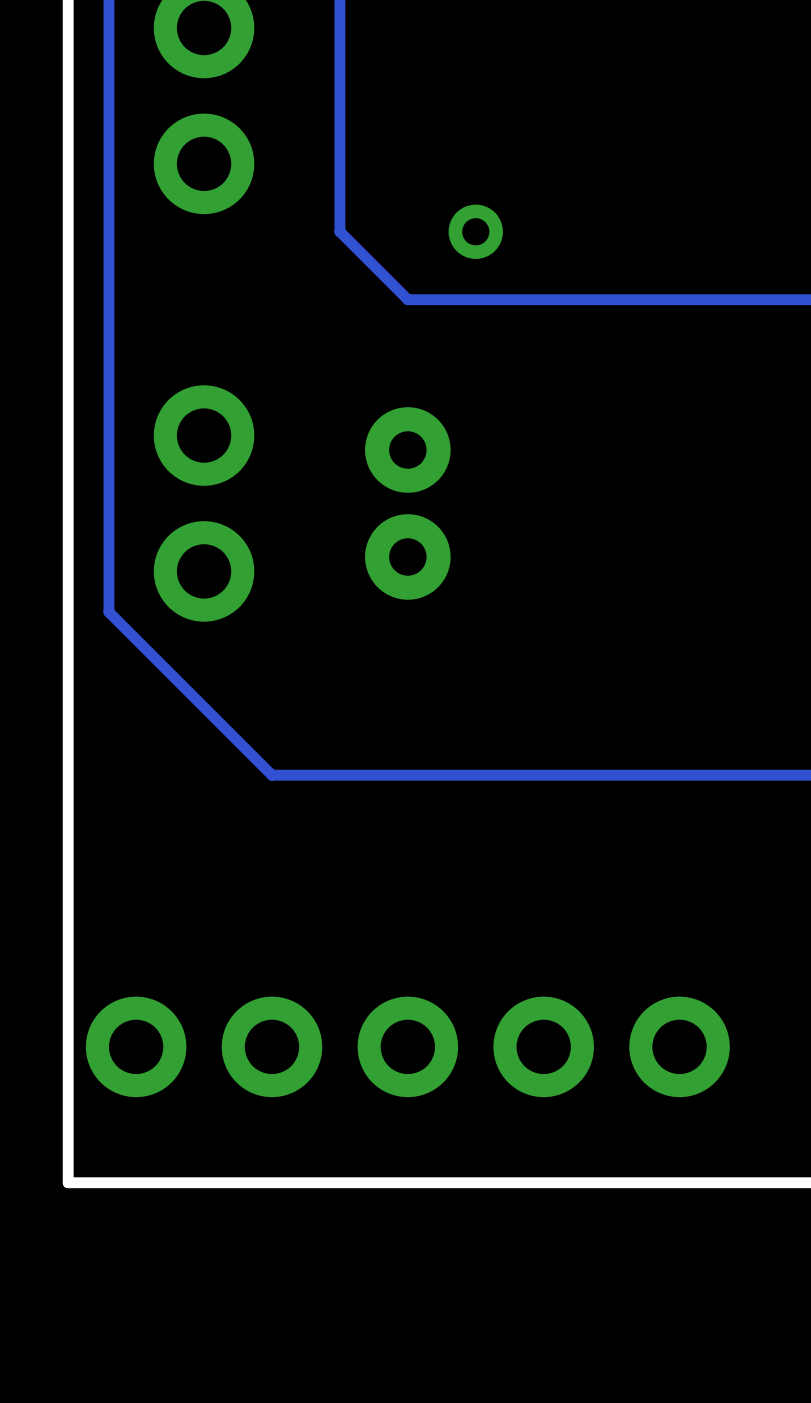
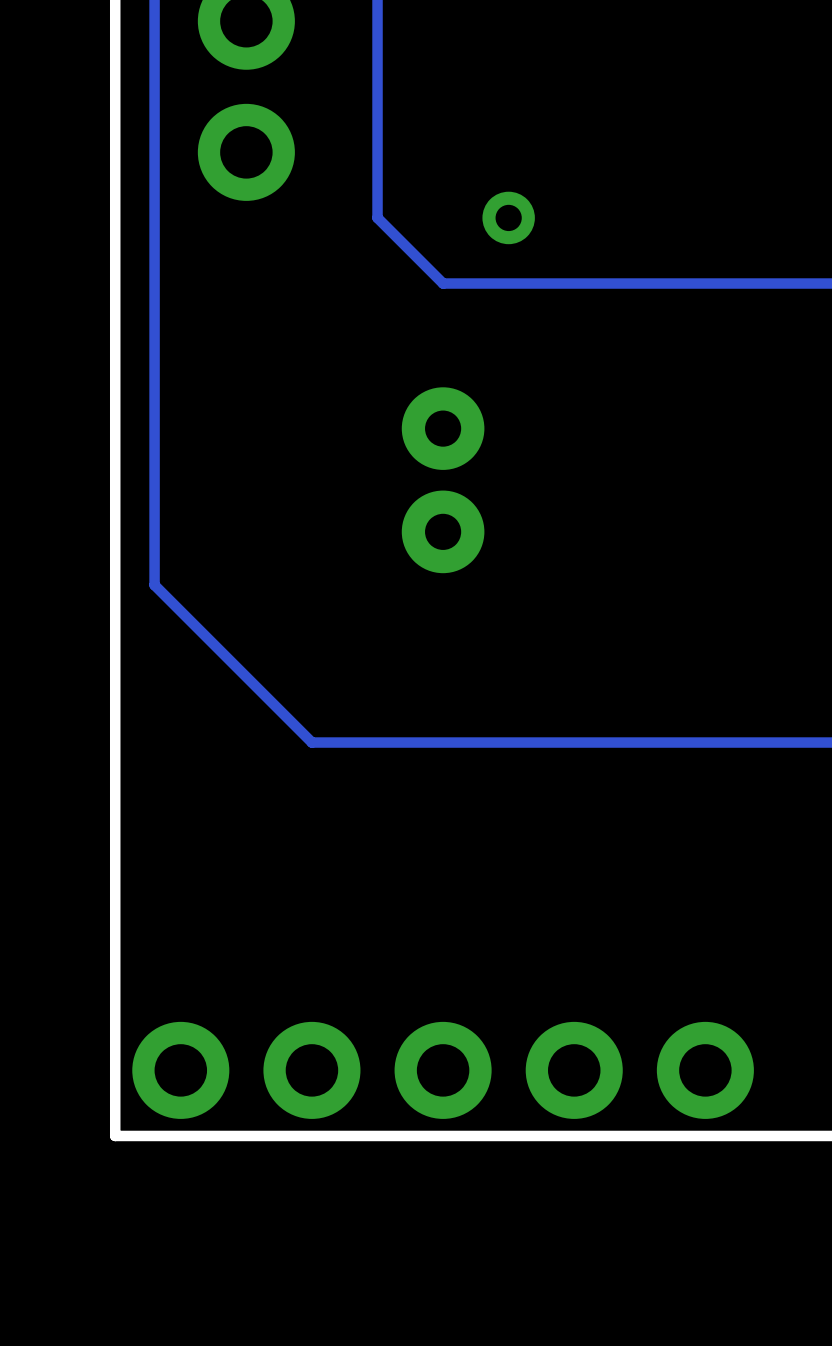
part: (204, 503) -> none
part position: (407, 1046) -> (443, 1070)

